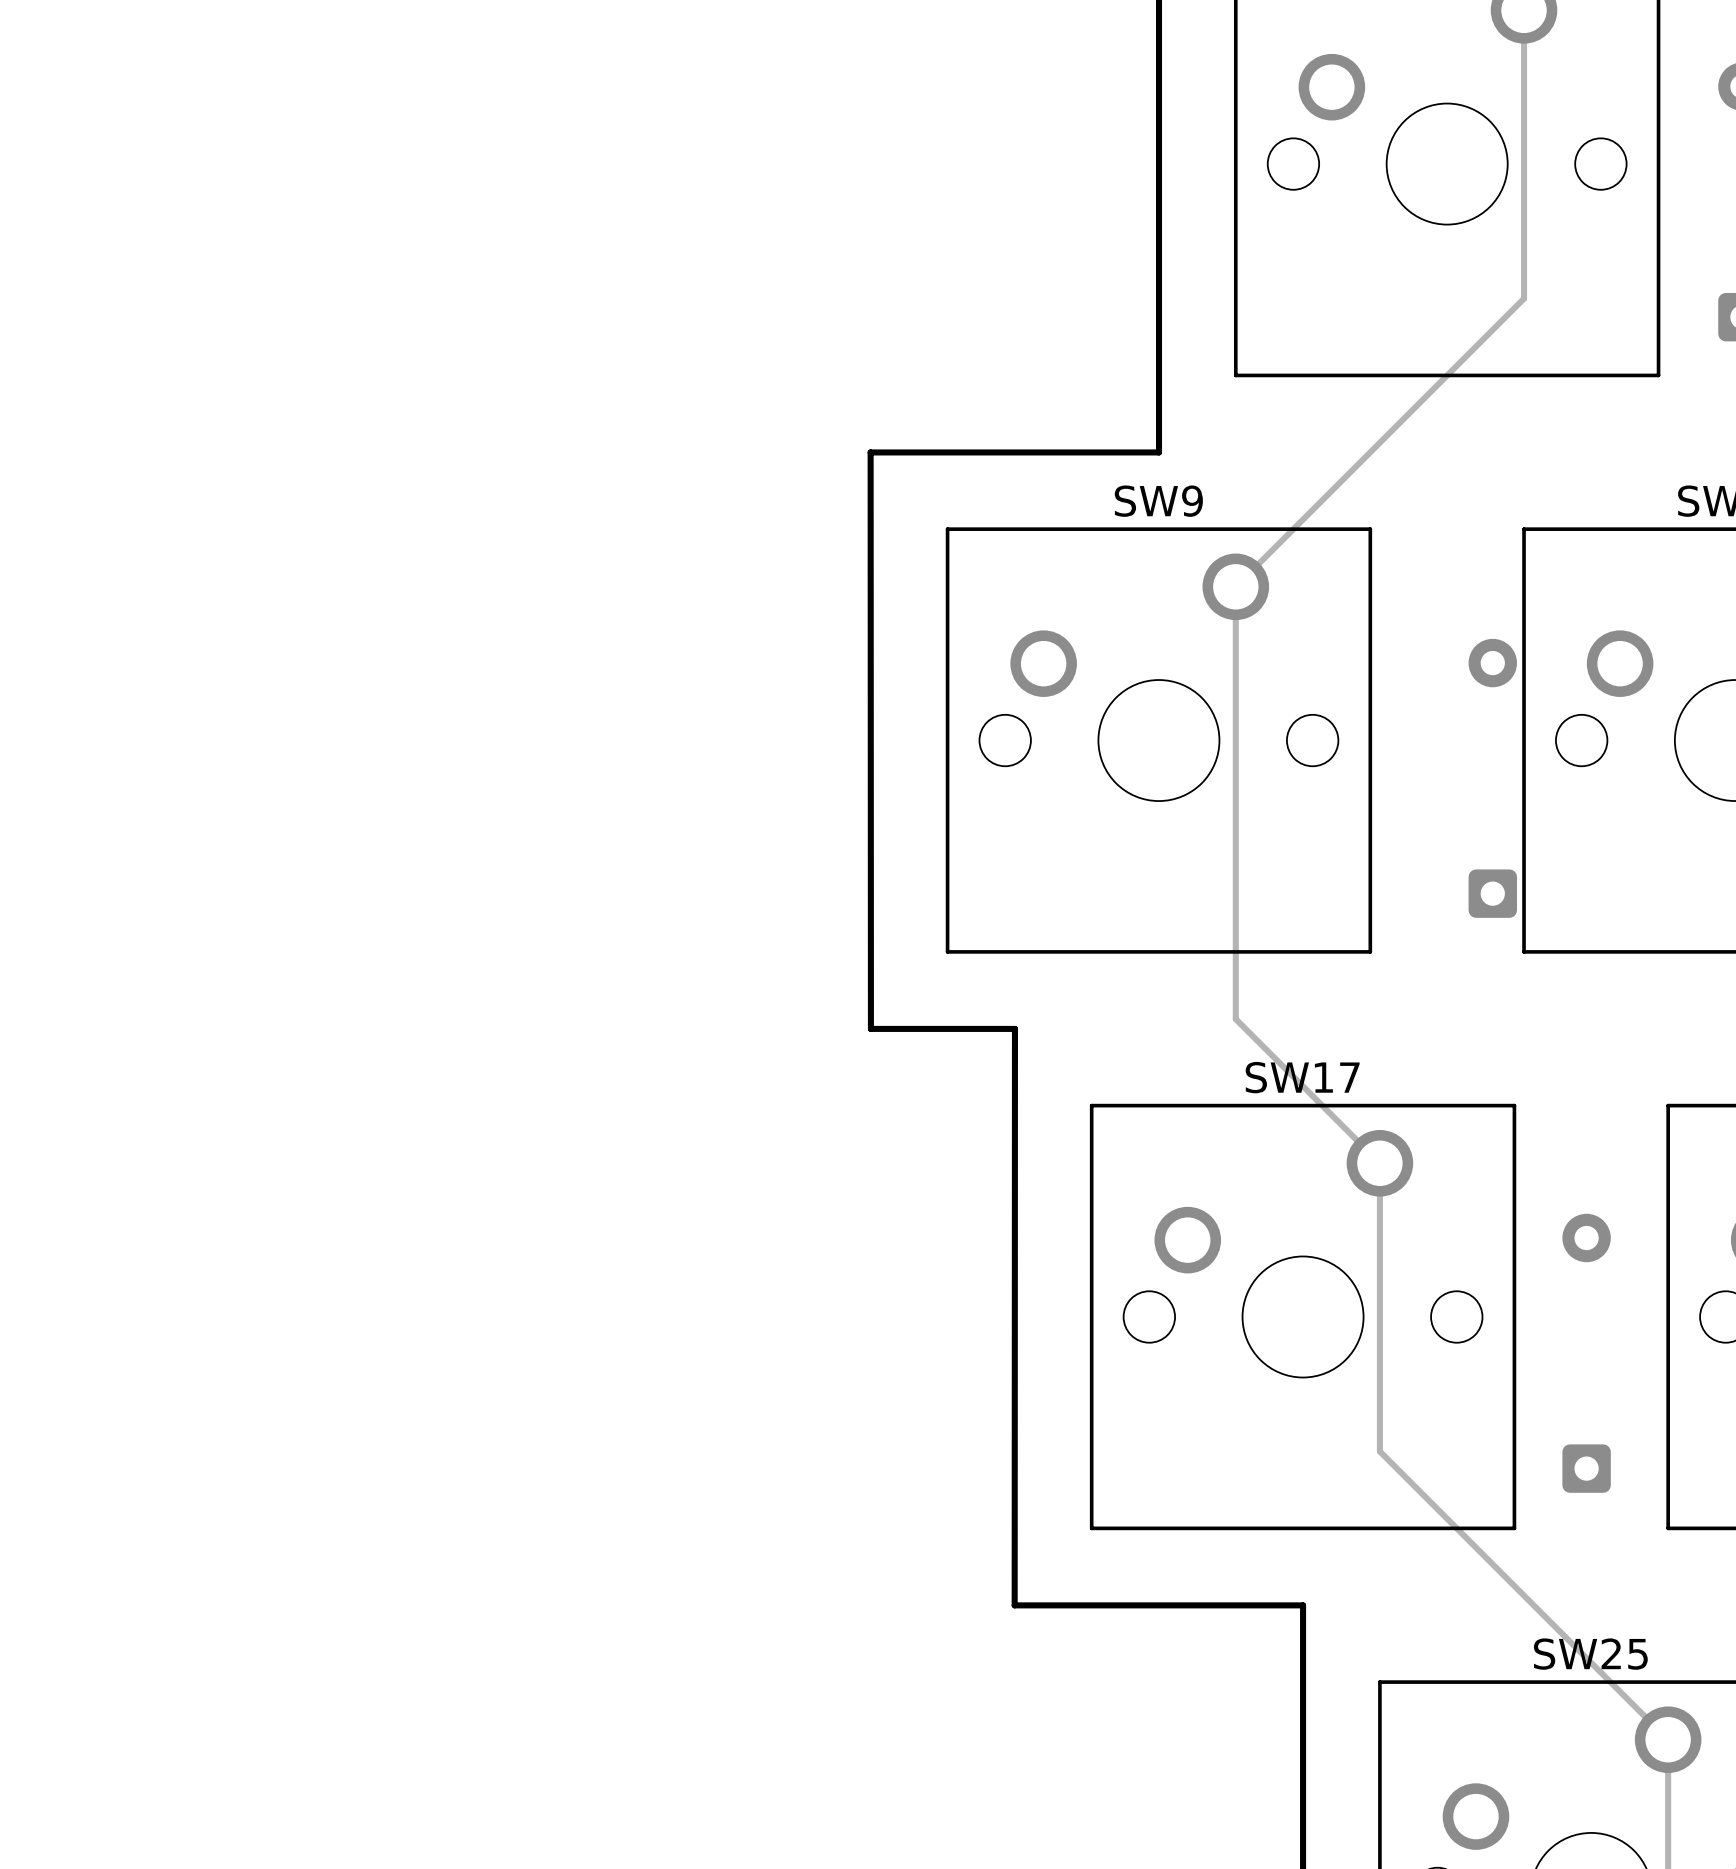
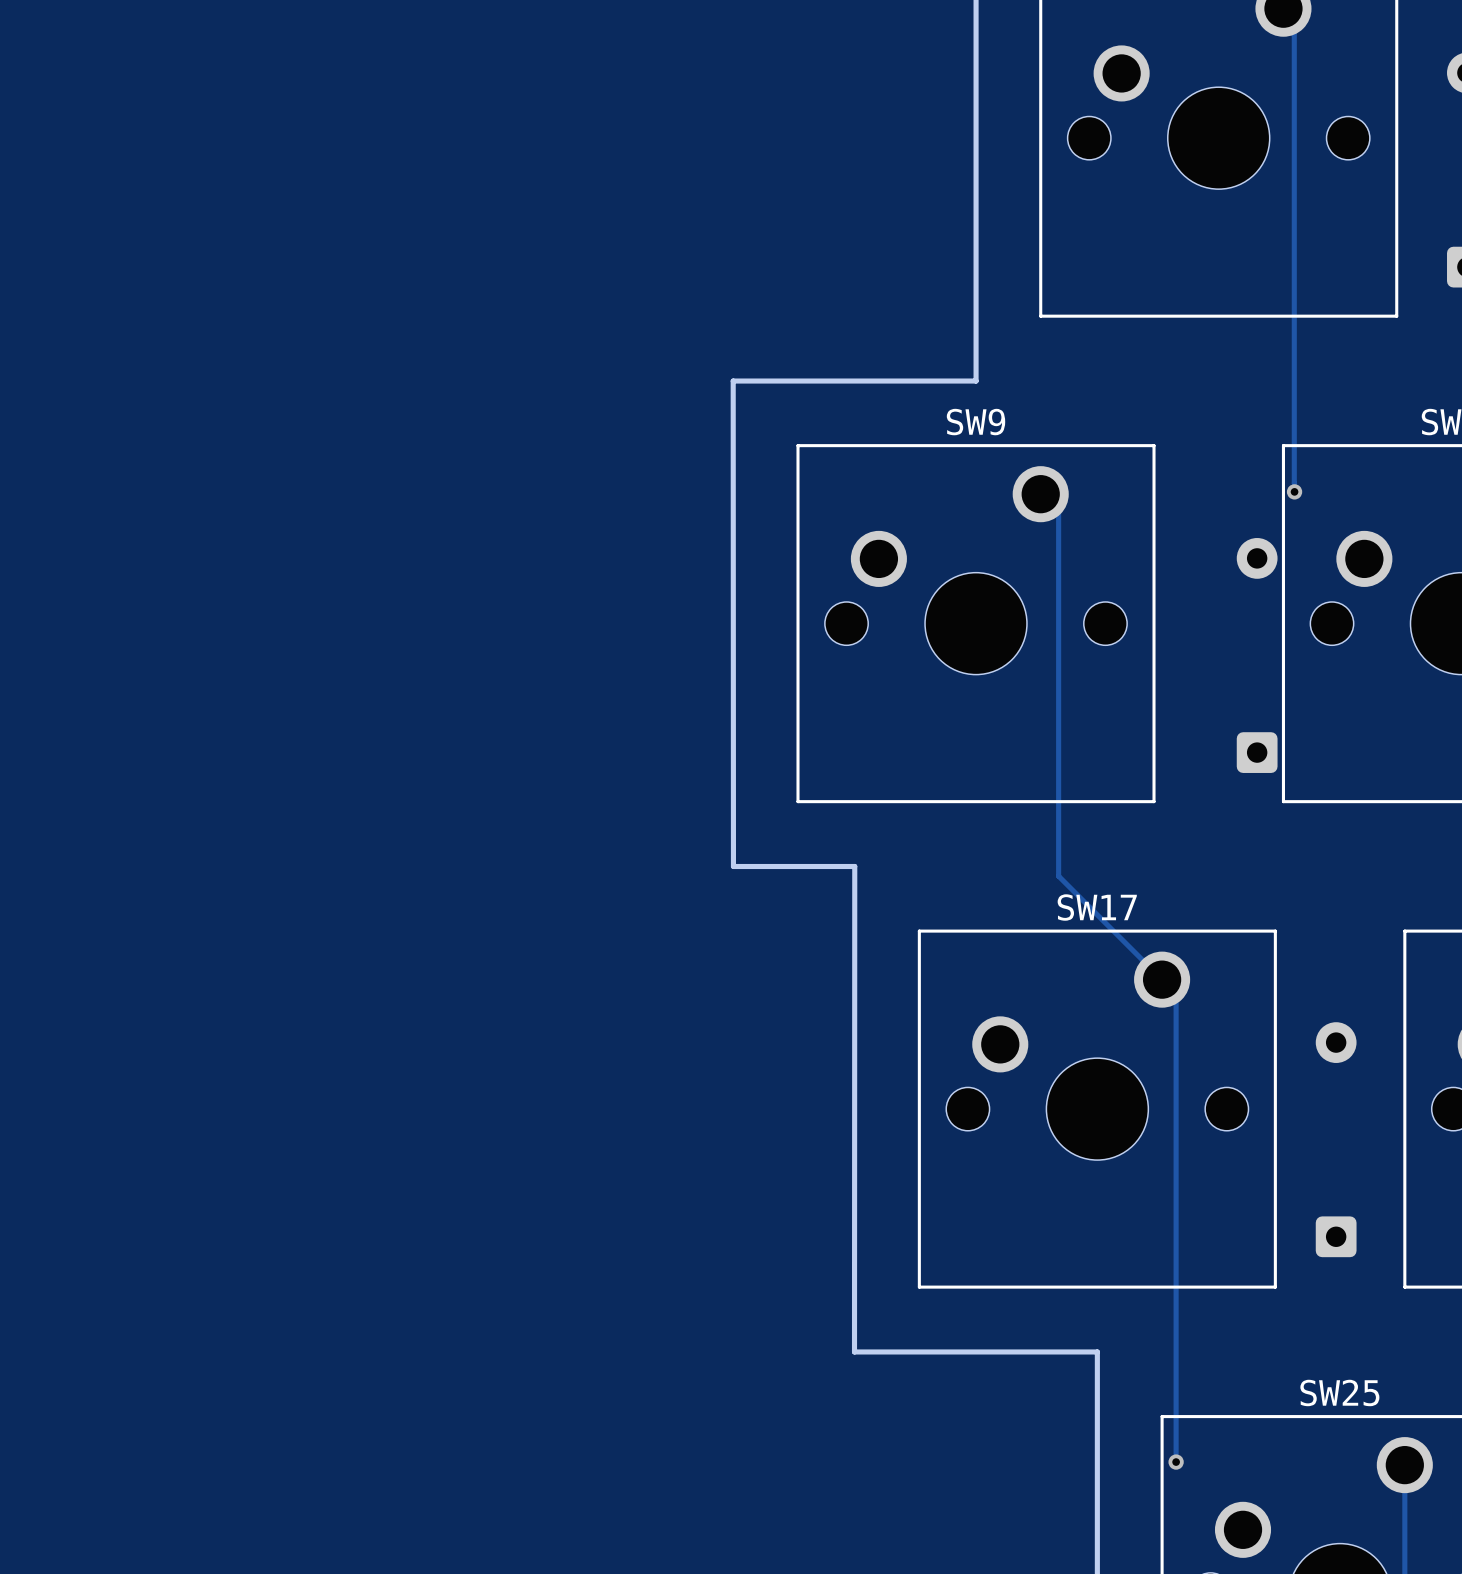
track: (1524, 10) (1524, 298) (1235, 586) (1235, 1019) (1257, 1040) -> (1283, 8) (1294, 19) (1294, 483)
via: none -> (1294, 491)
track: none -> (1040, 494) (1058, 512) (1058, 876)
track: (1379, 1163) (1379, 1451) (1668, 1739) -> (1162, 979) (1176, 993) (1176, 1462)
via: none -> (1176, 1462)

